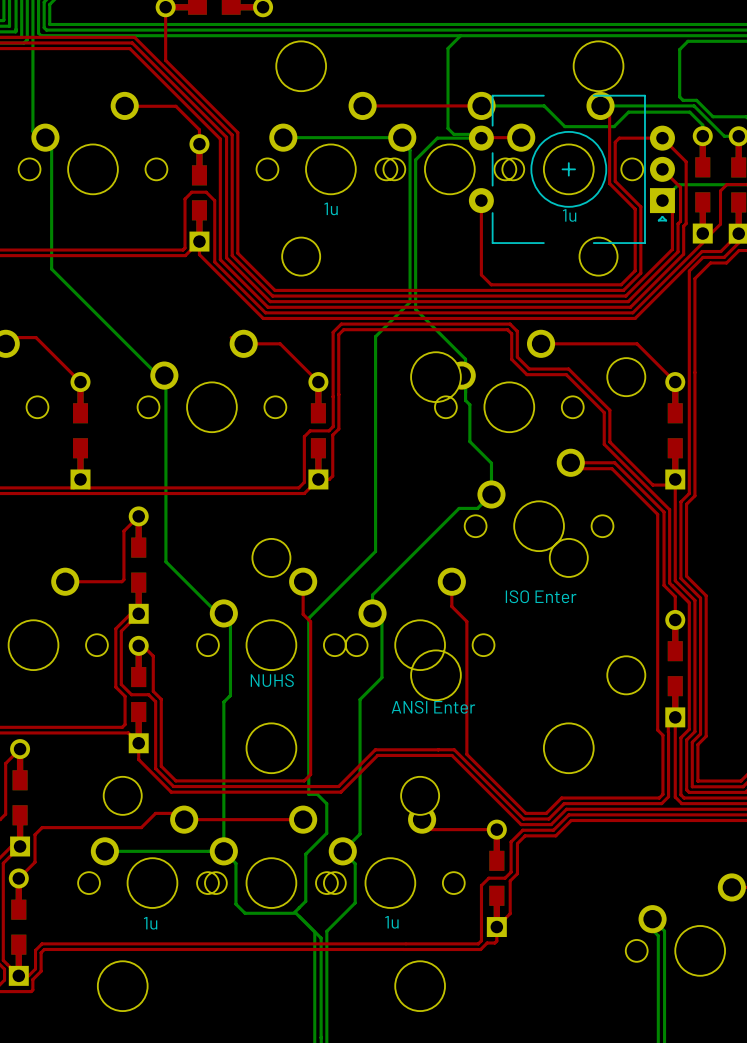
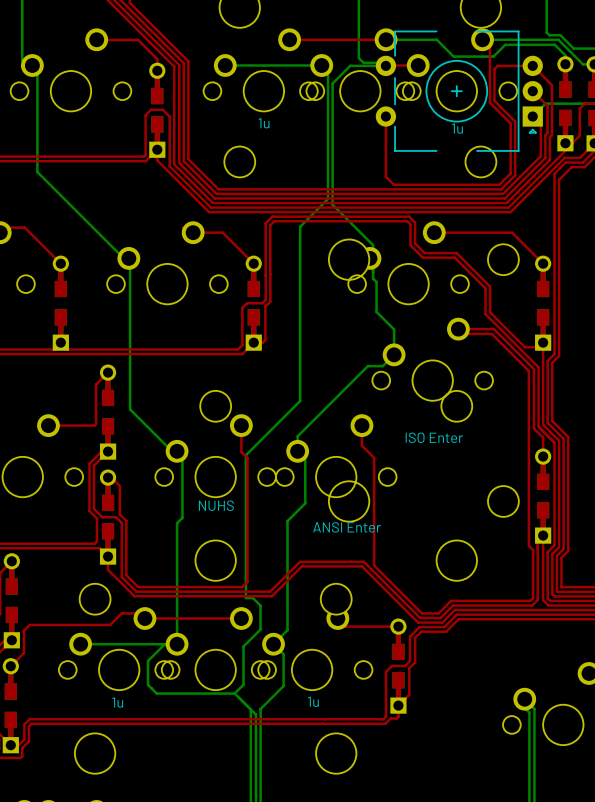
bottom track: none -> (164, 644) (148, 661) (148, 684) (156, 693) (234, 693)
bottom track: (223, 851) (235, 863) (235, 904) (245, 913) (296, 913) -> none

